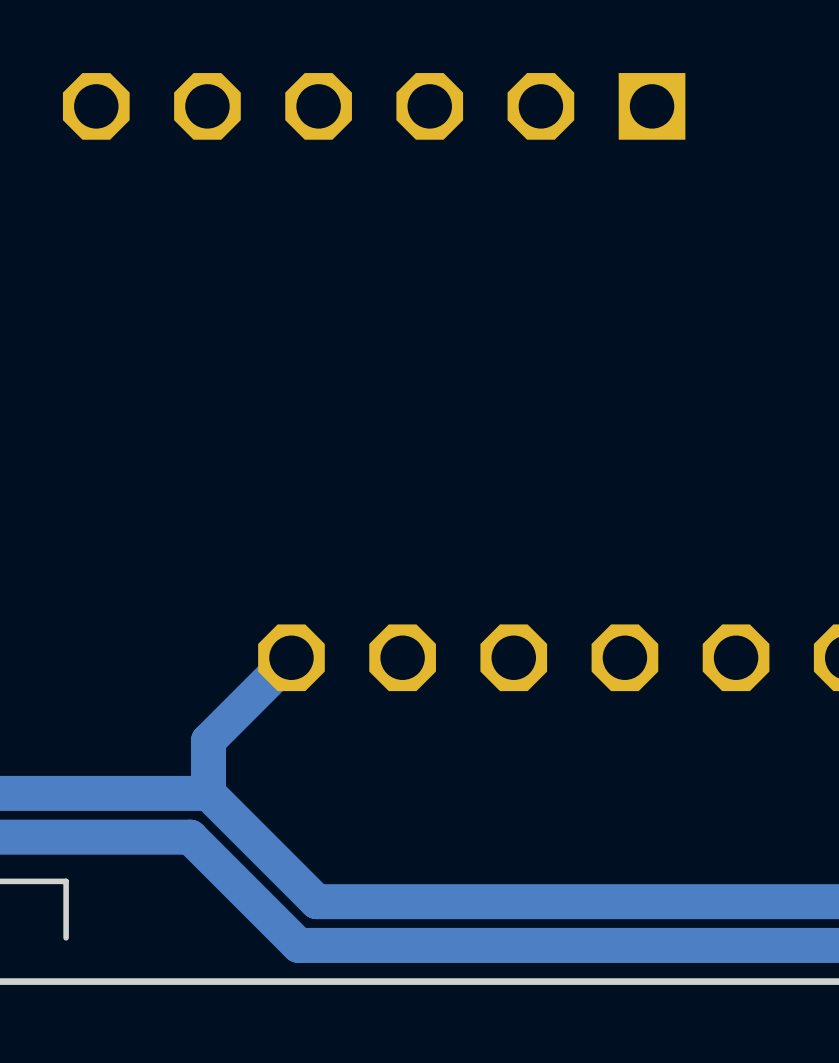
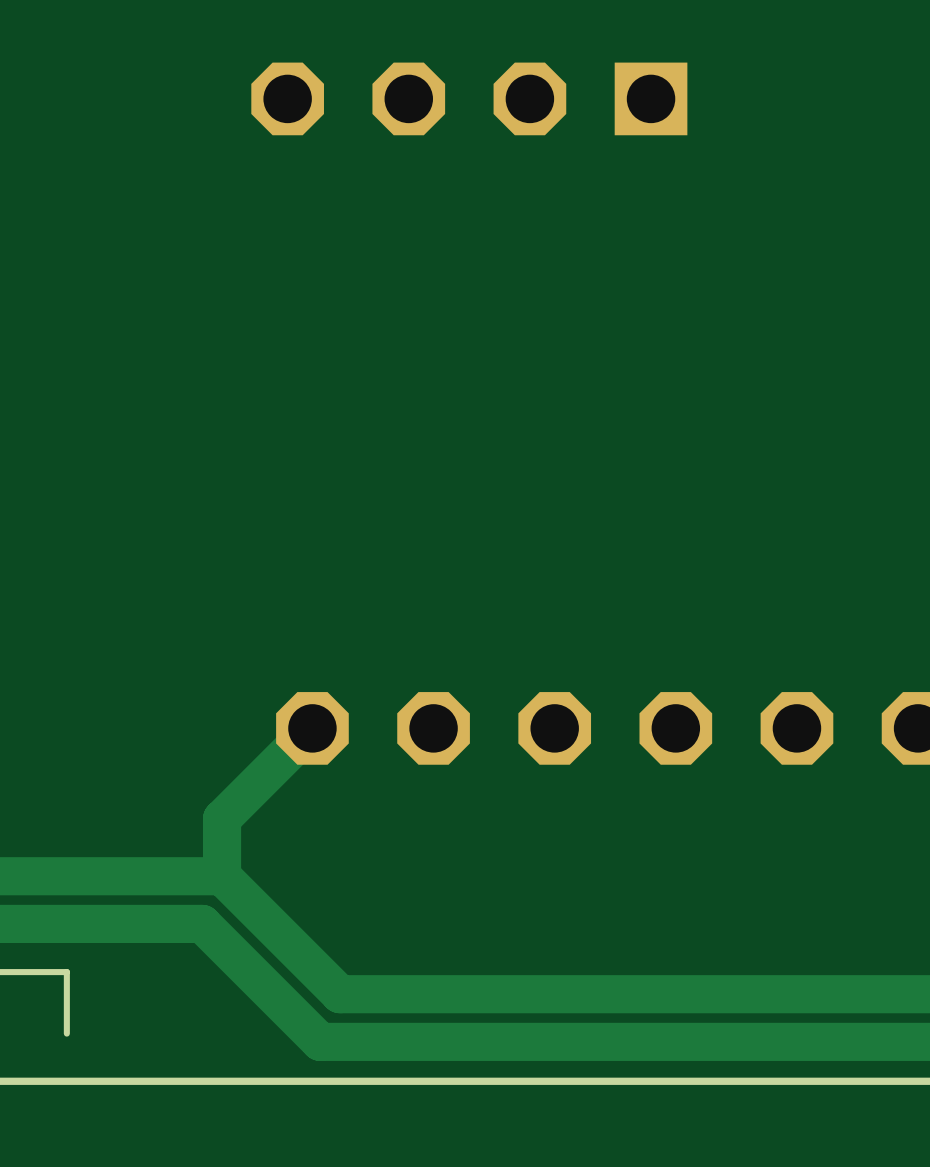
part: none -> (469, 98)
part: (374, 106) -> none

